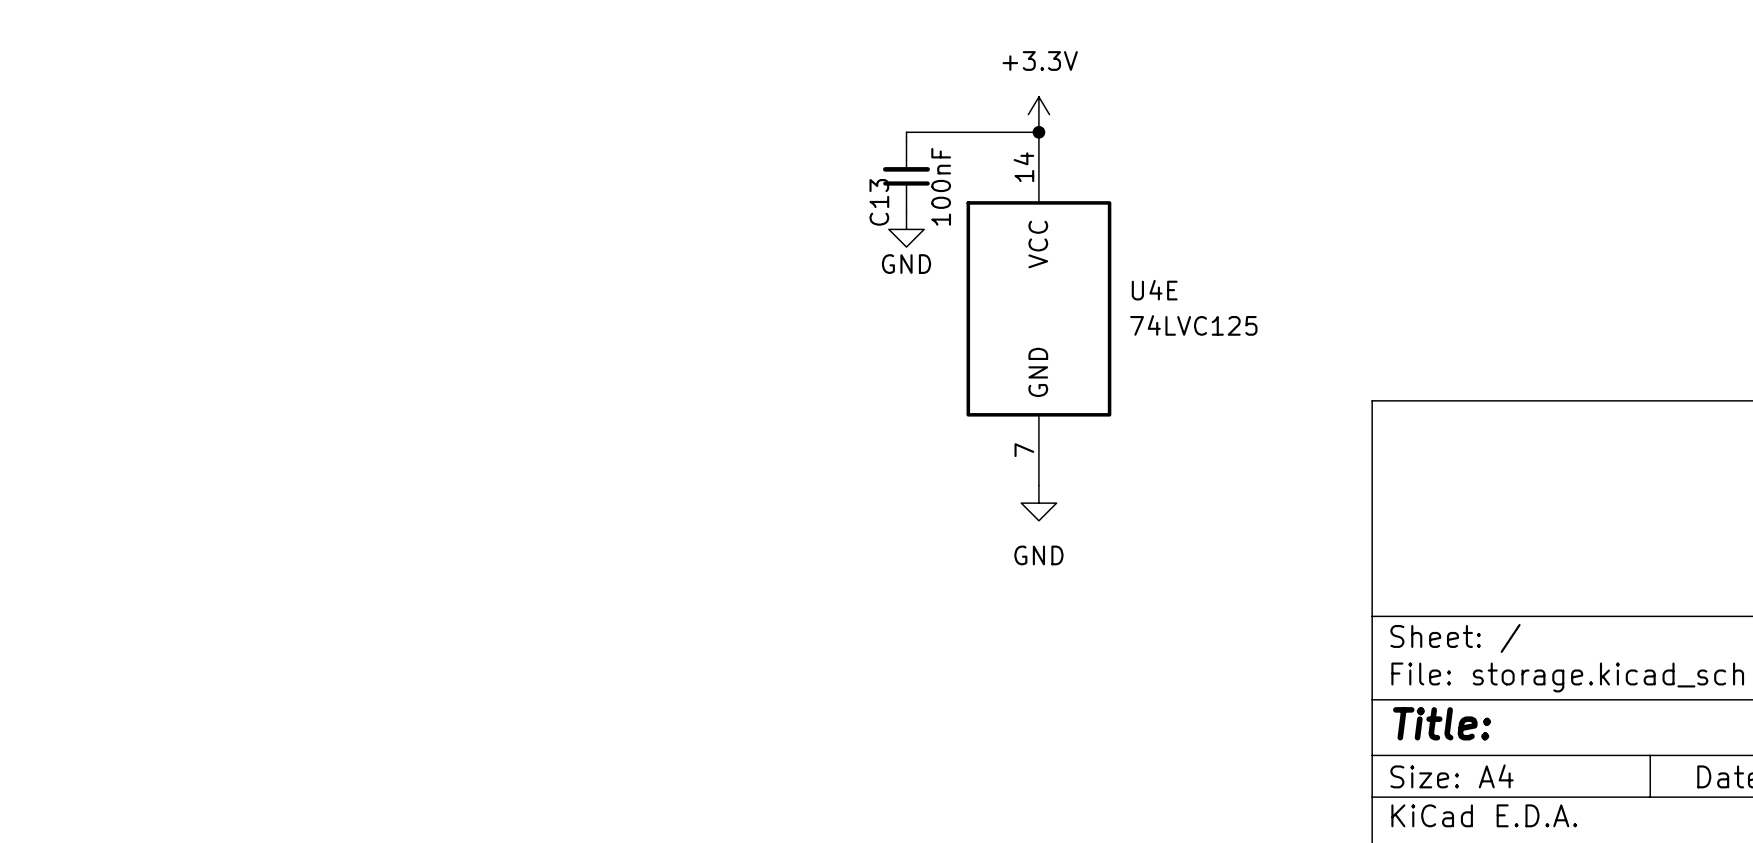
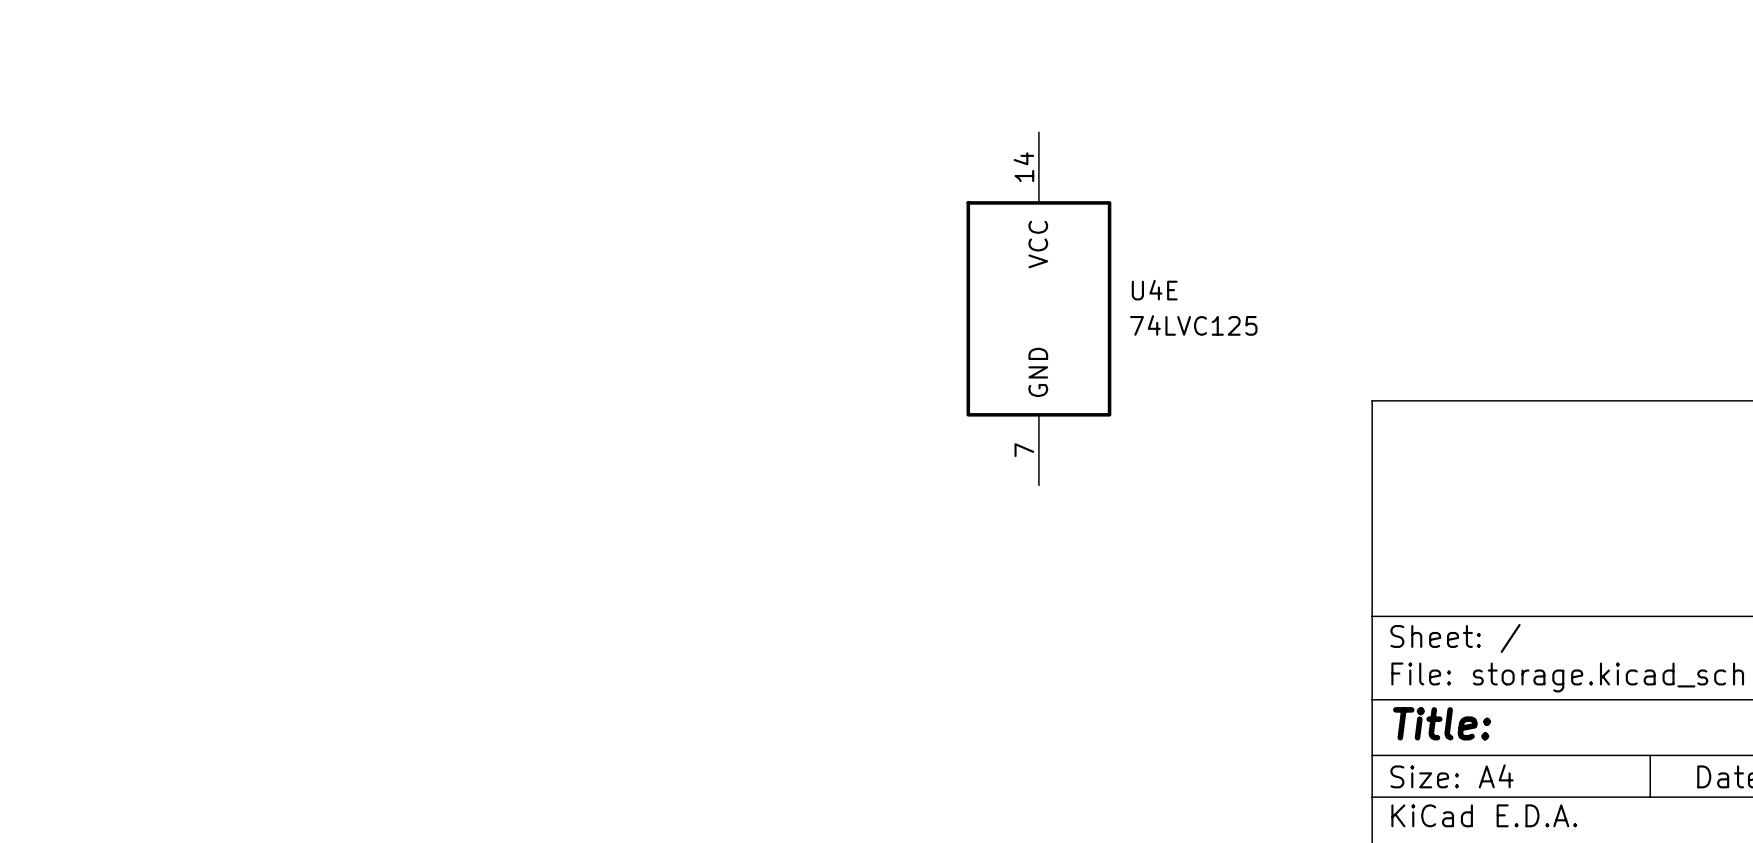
power symbol: +3.3V (1038, 114) -> none
wire: (1038, 132) (906, 132) (906, 141) -> none
junction: (1038, 132) -> none
C13: 100nF (906, 176) -> none
power symbol: GND (906, 229) -> none
power symbol: GND (1038, 503) -> none

